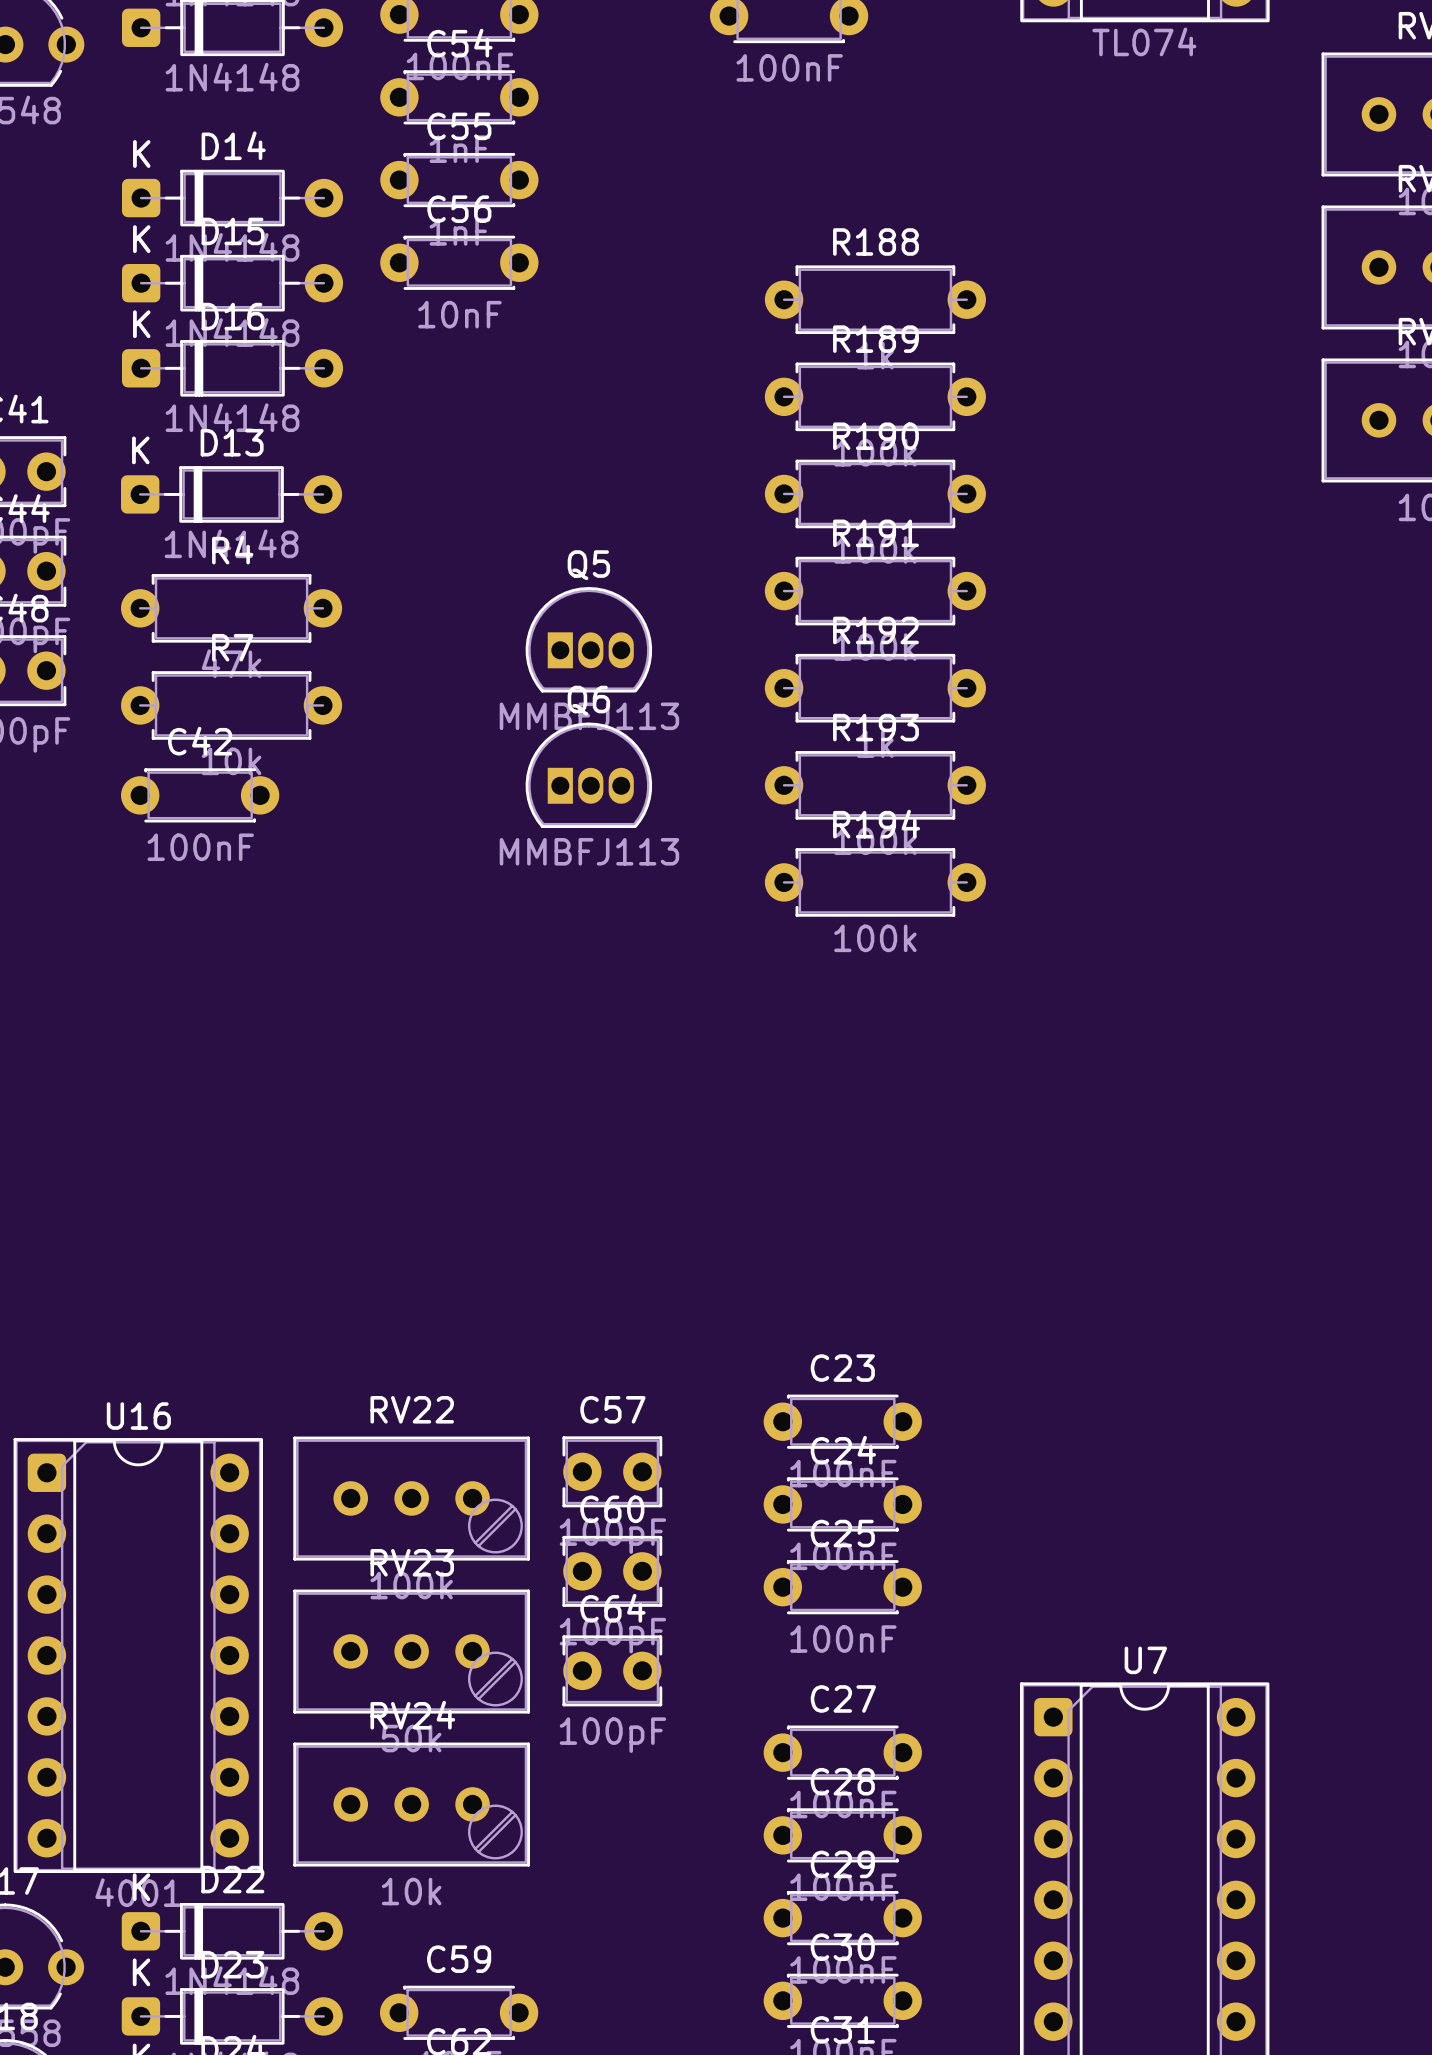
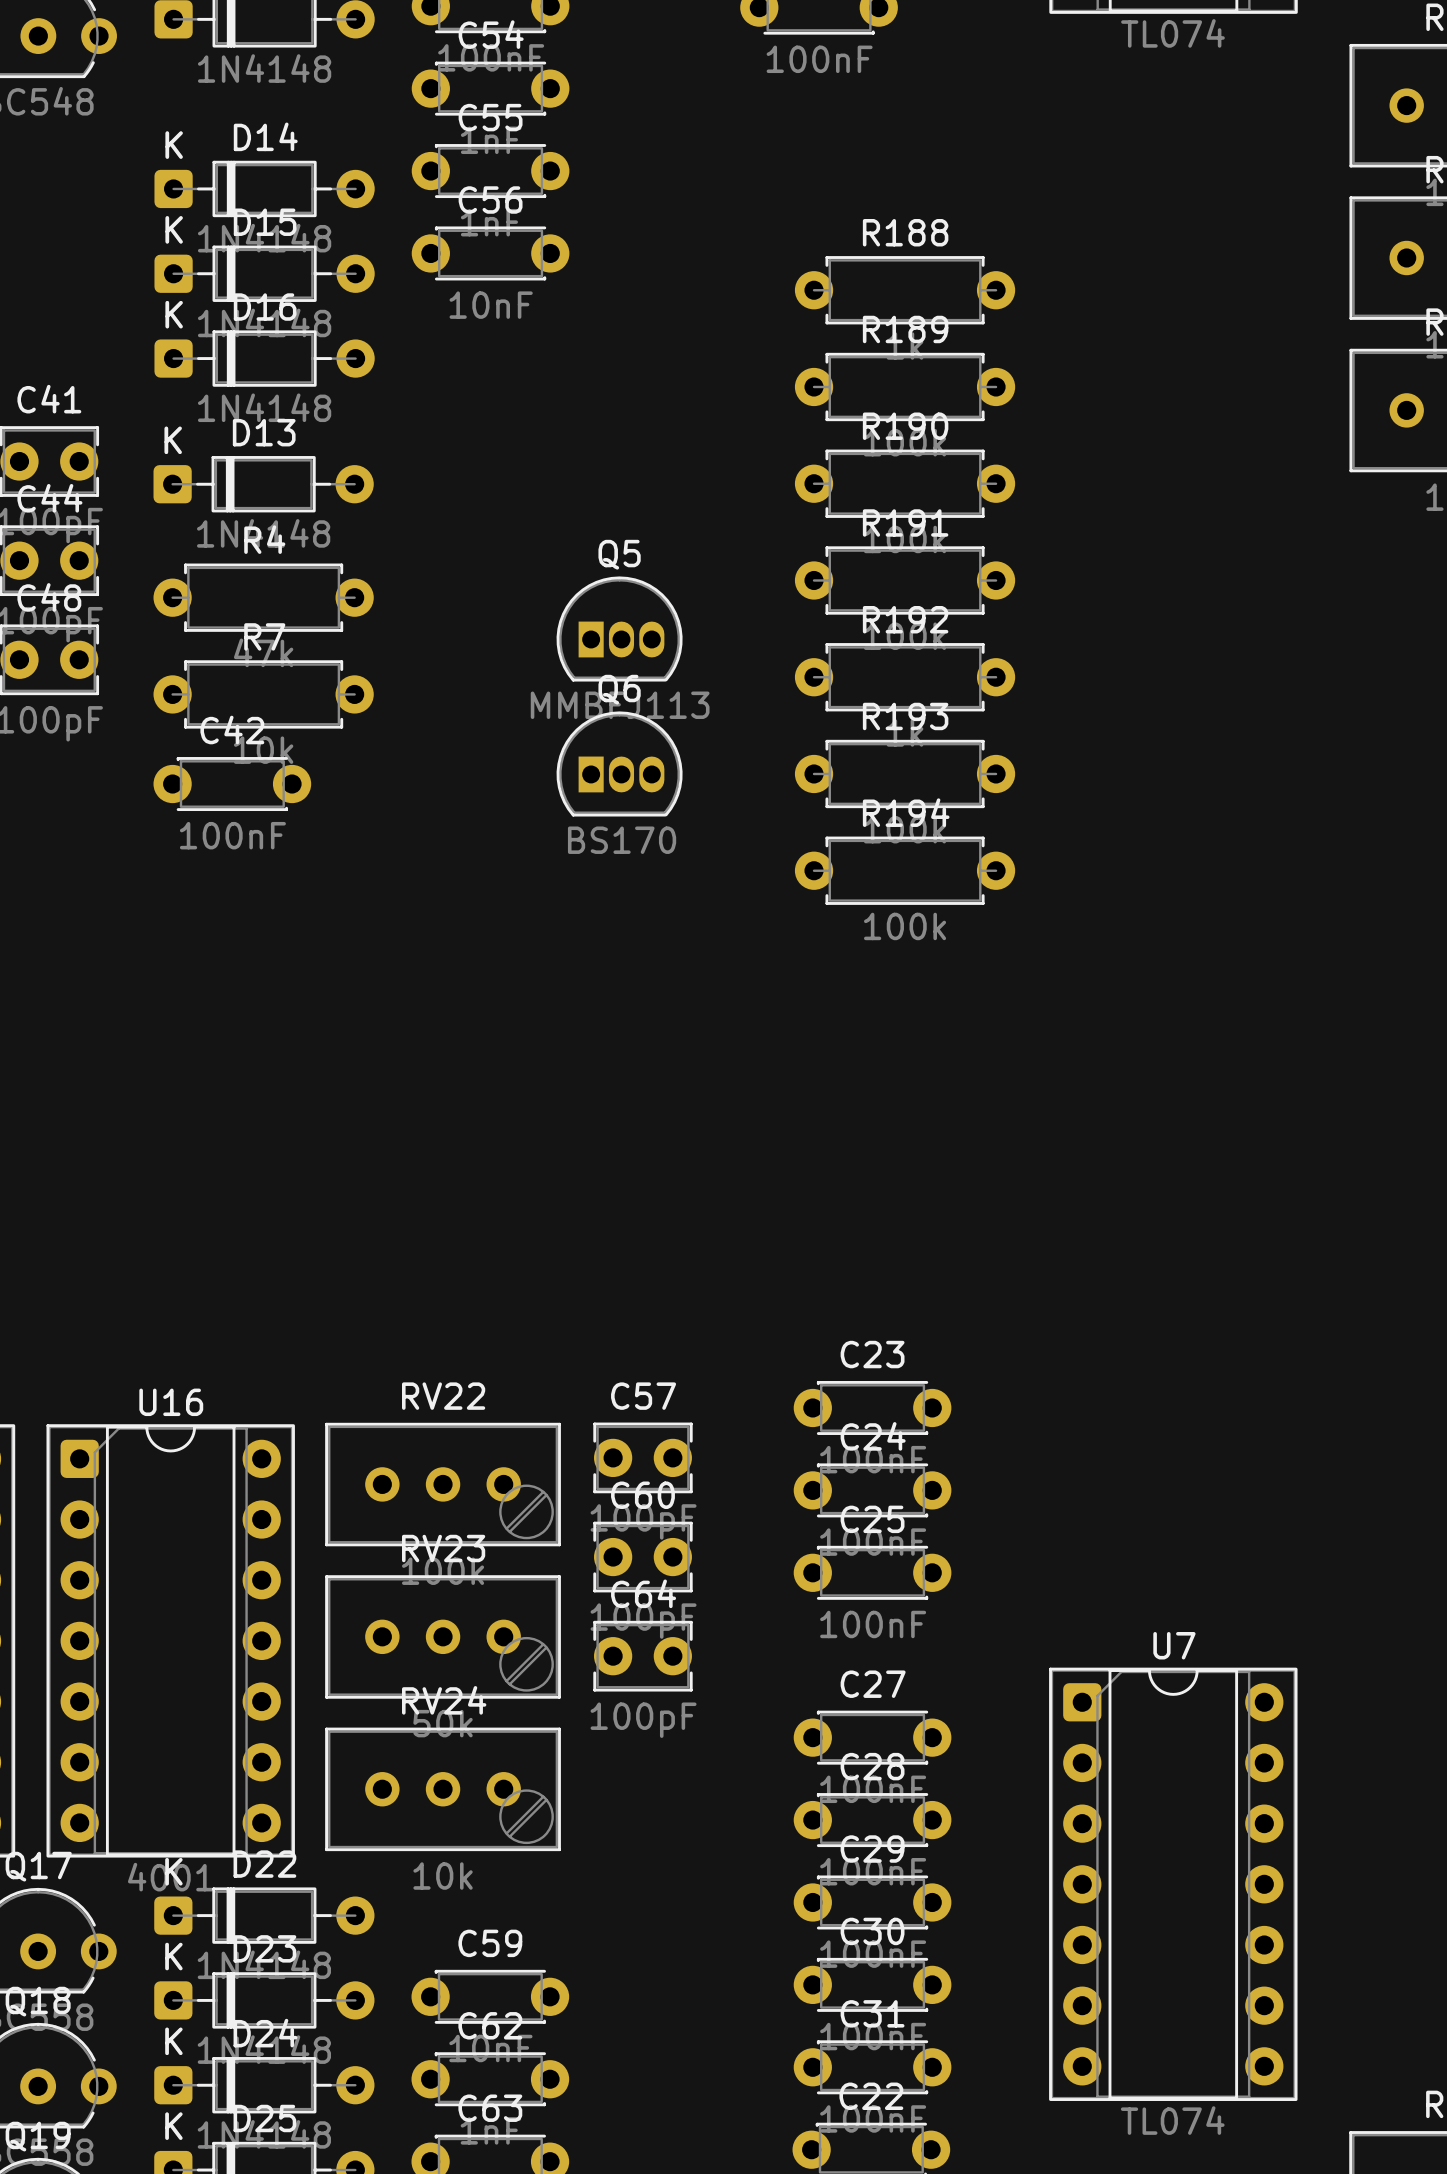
Q6 value: MMBFJ113 (589, 851) -> BS170 (622, 840)

